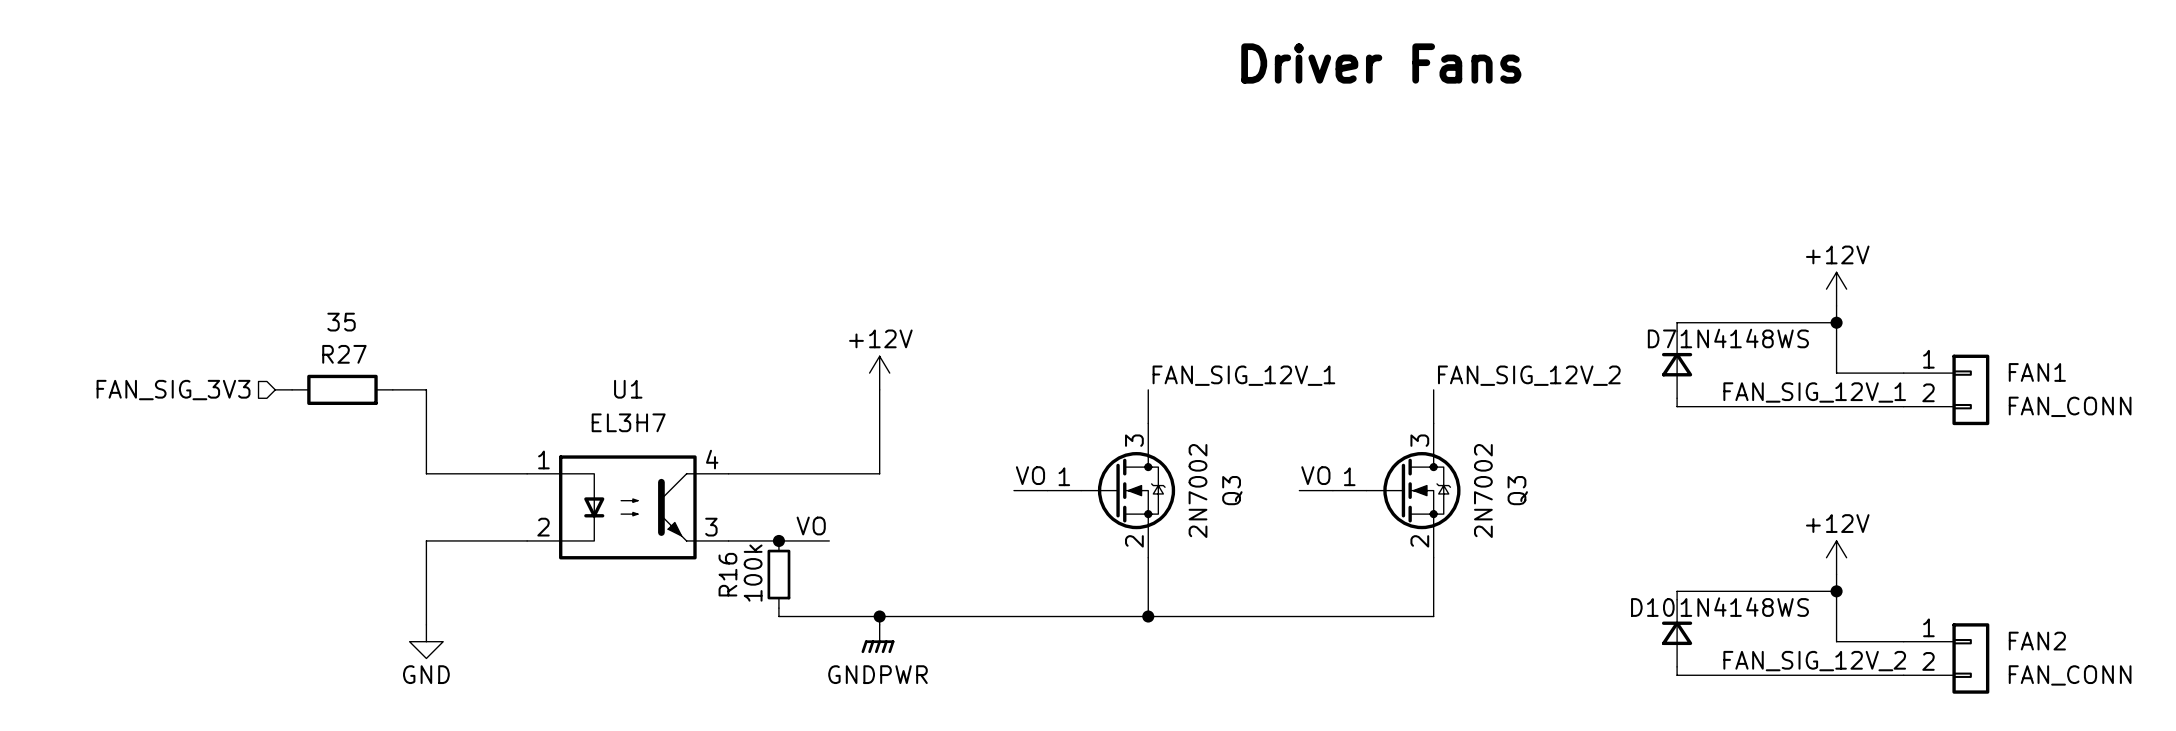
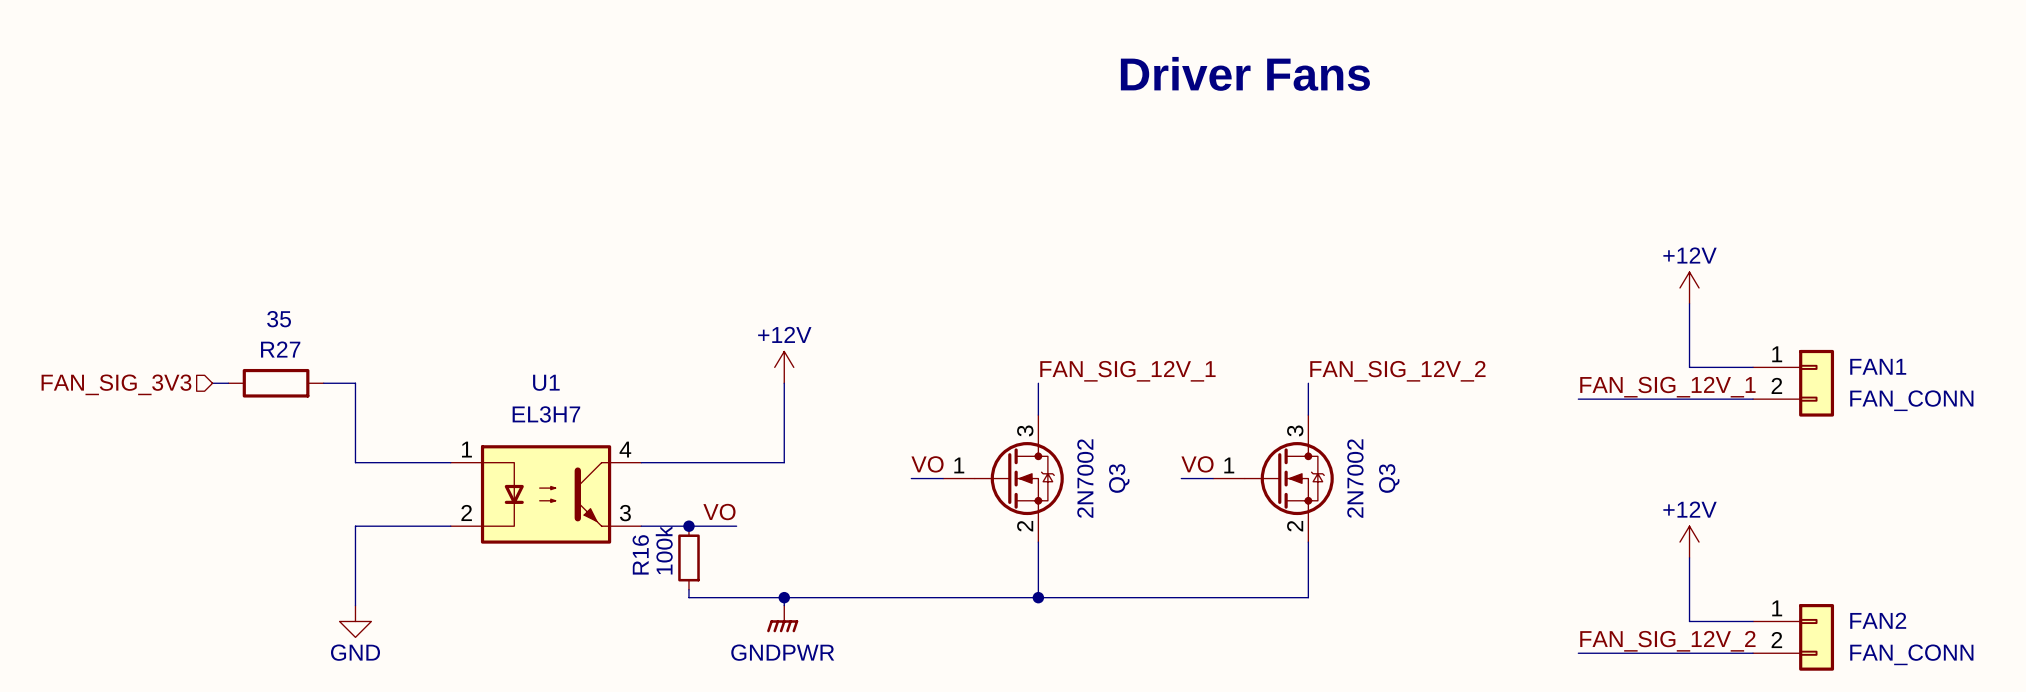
wire: (1836, 322) (1677, 322) (1677, 331) -> none
junction: (1836, 322) -> none
D7: 1N4148WS (1677, 364) -> none
wire: (1677, 398) (1677, 406) (1719, 406) -> none
wire: (1836, 591) (1677, 591) (1677, 599) -> none
junction: (1836, 591) -> none
D10: 1N4148WS (1677, 633) -> none
wire: (1677, 666) (1677, 675) (1719, 675) -> none

